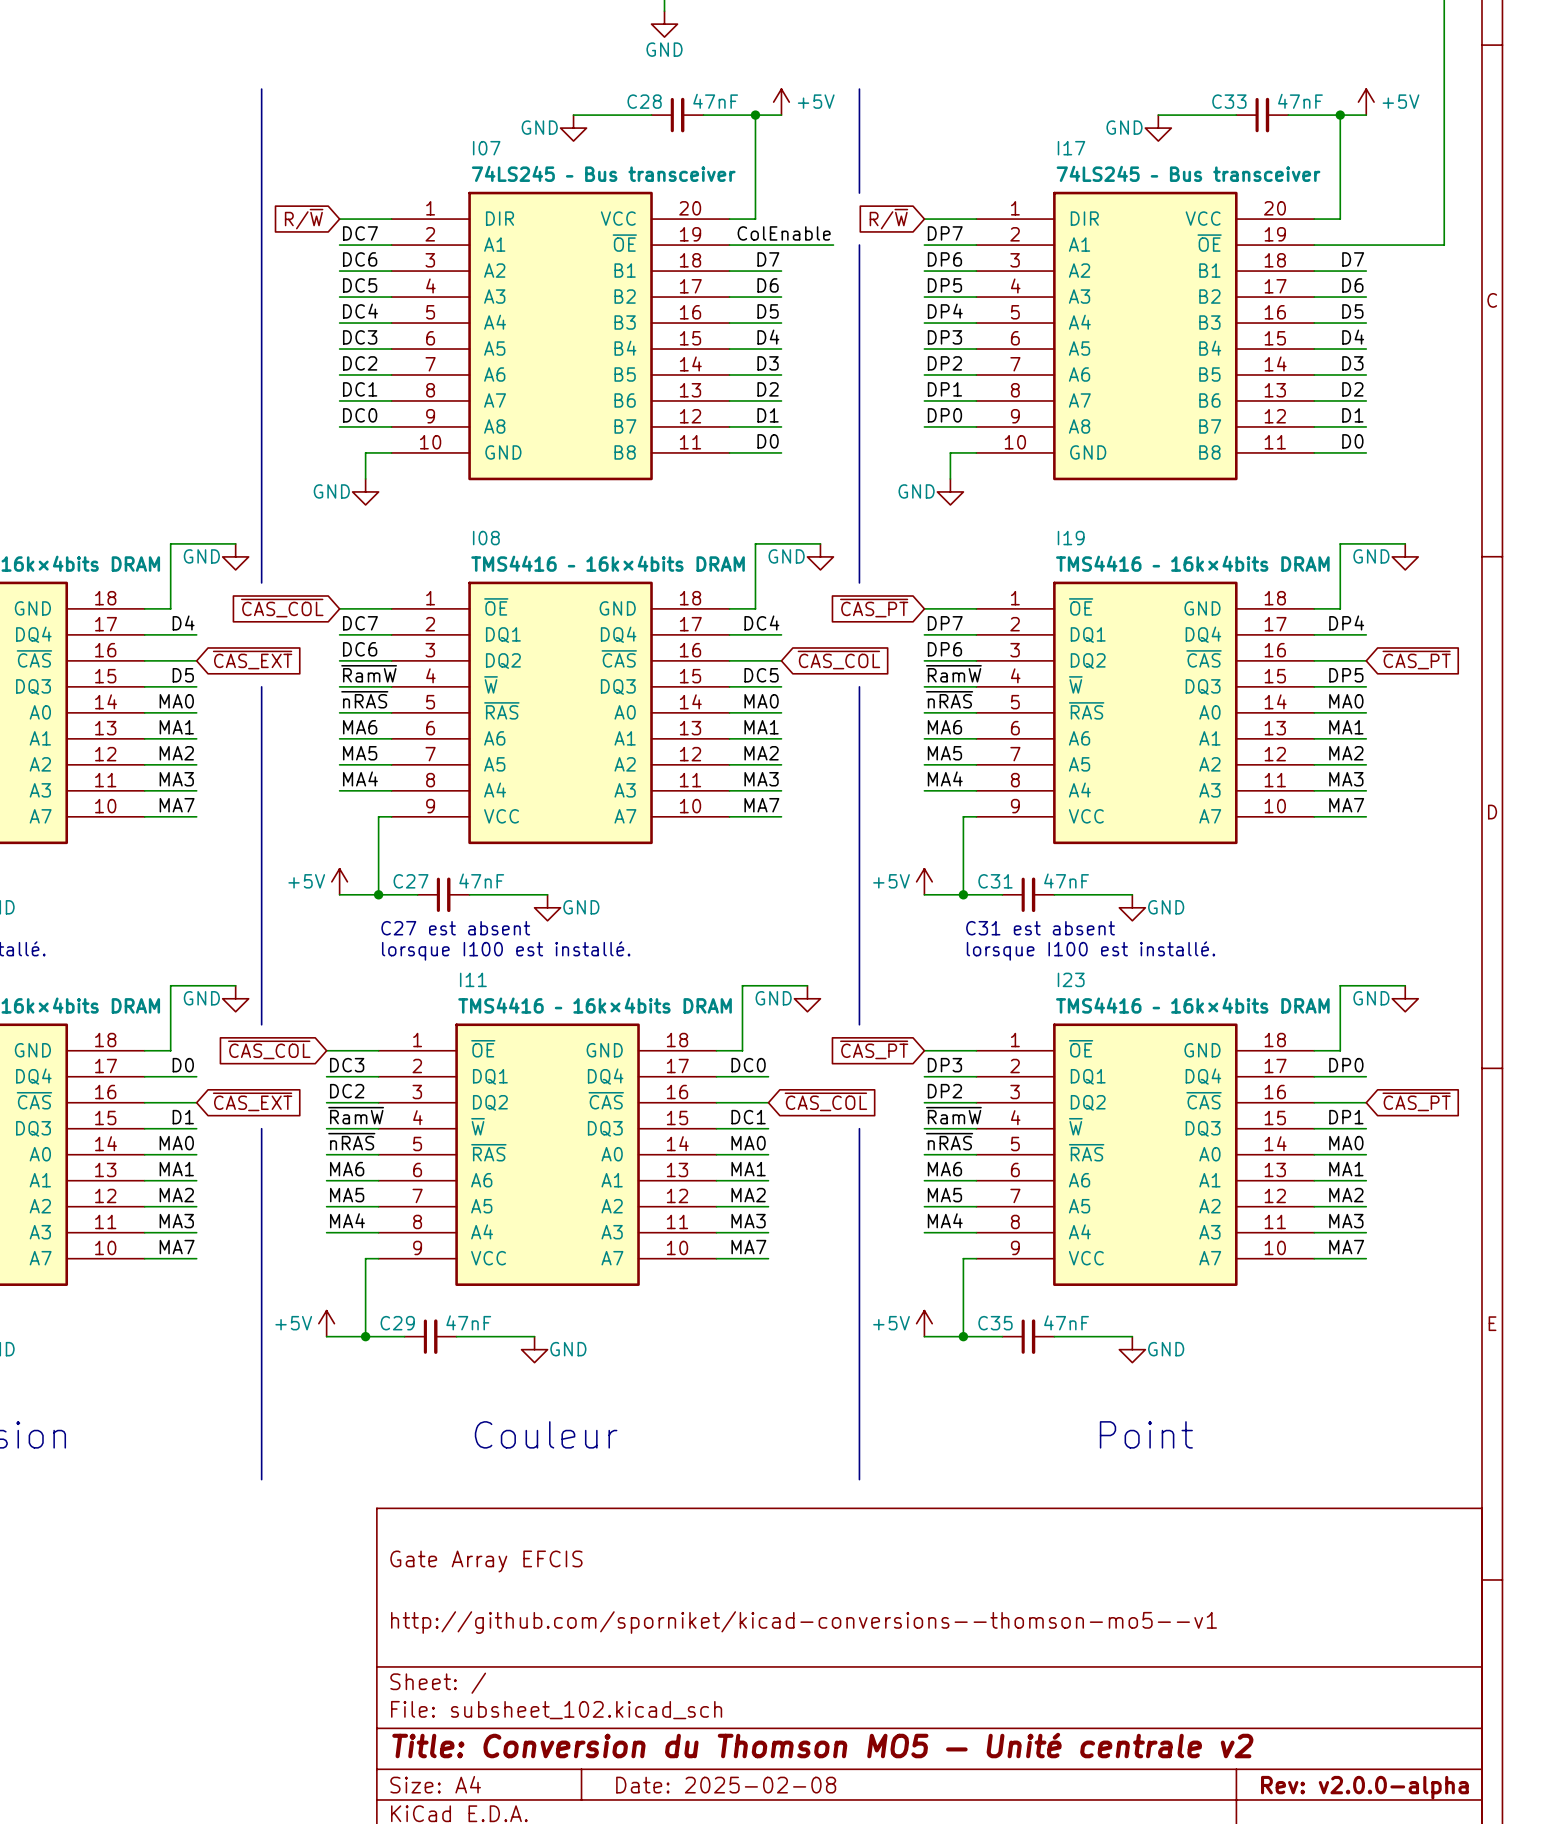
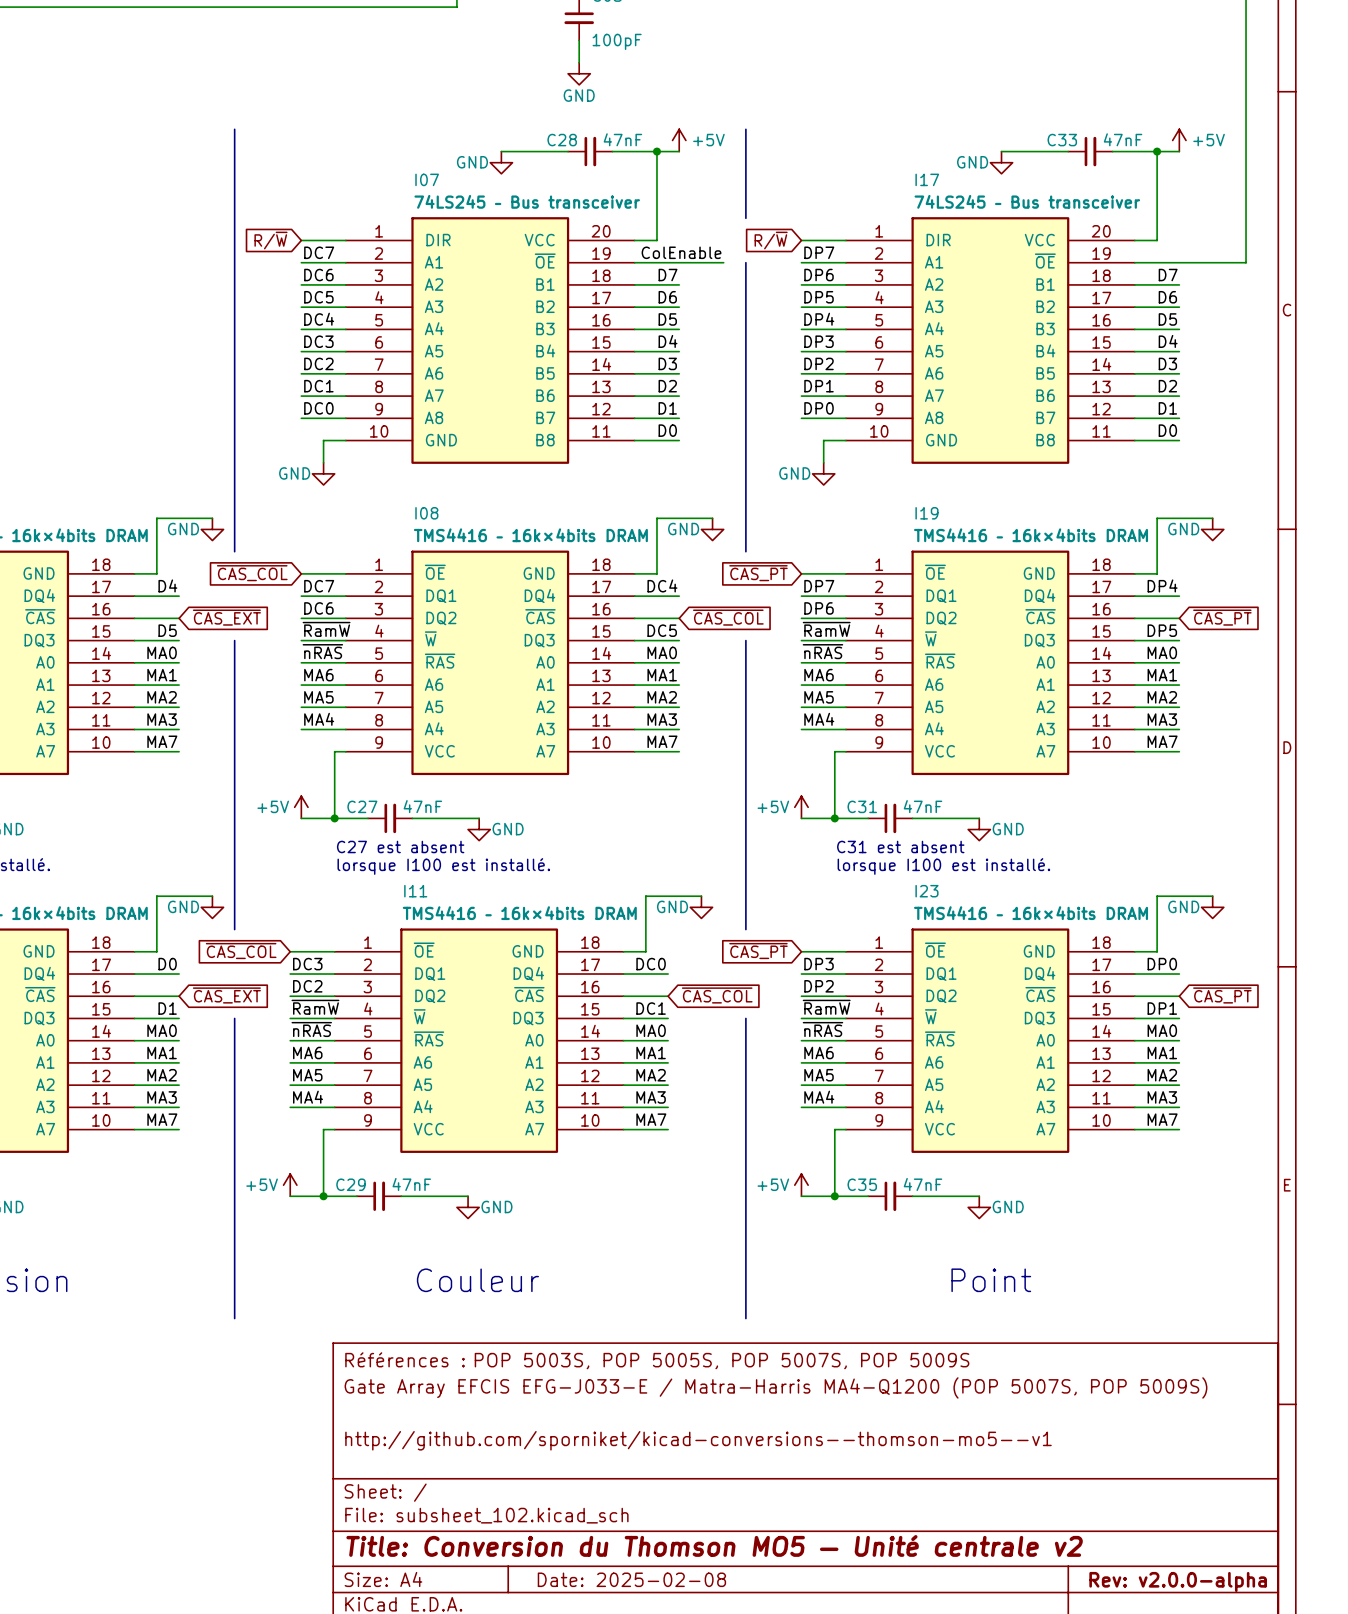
title block: none -> Références : POP 5003S, POP 5005S, POP 5007S, POP 5009S (657, 1360)
title block: Gate Array EFCIS (486, 1561) -> Gate Array EFCIS EFG-J033-E / Matra-Harris MA4-Q1200 (POP 5007S, POP 5009S) (776, 1387)

